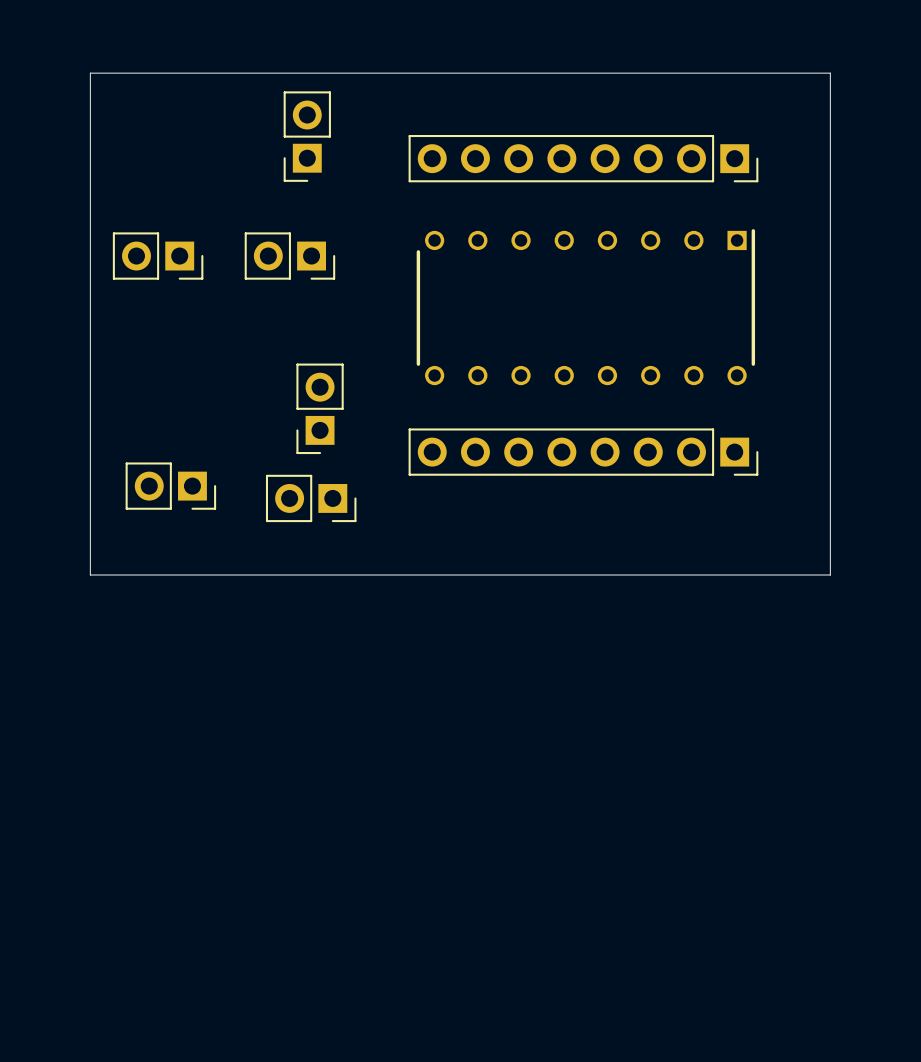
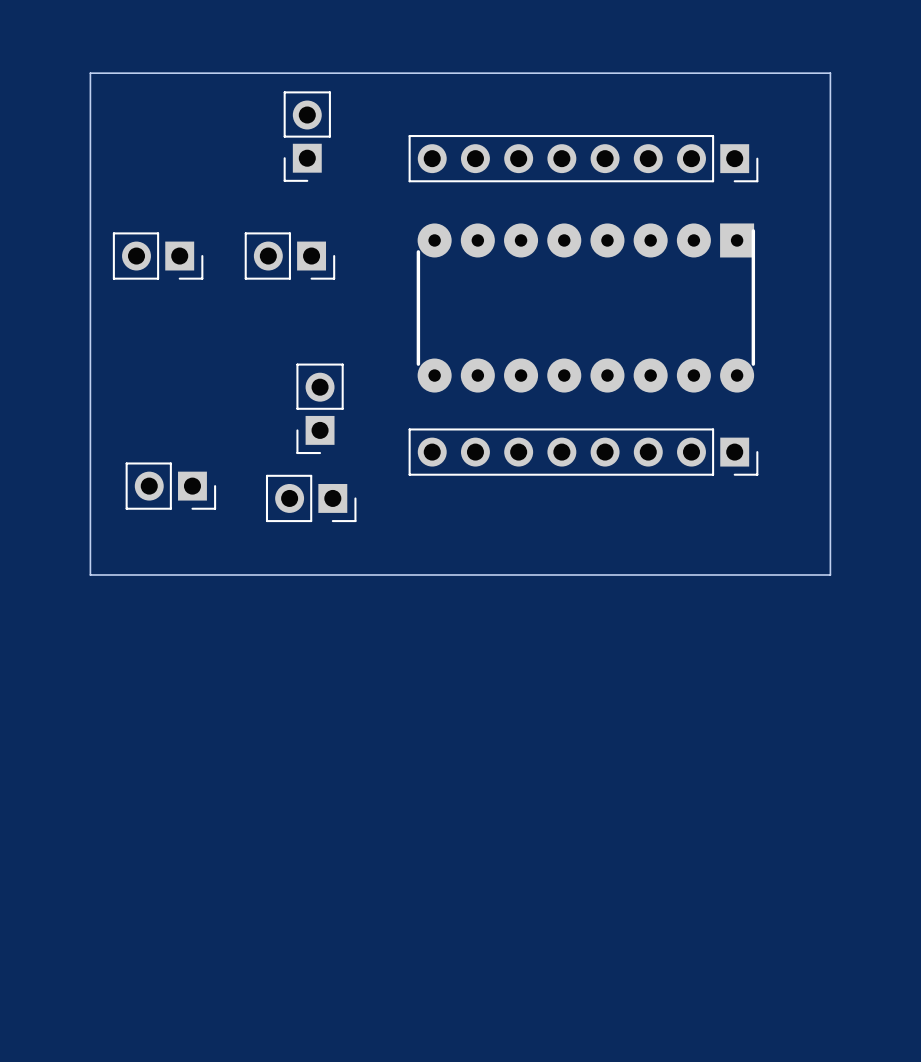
part footprint: [416, 229, 756, 386] -> [416, 223, 756, 393]

